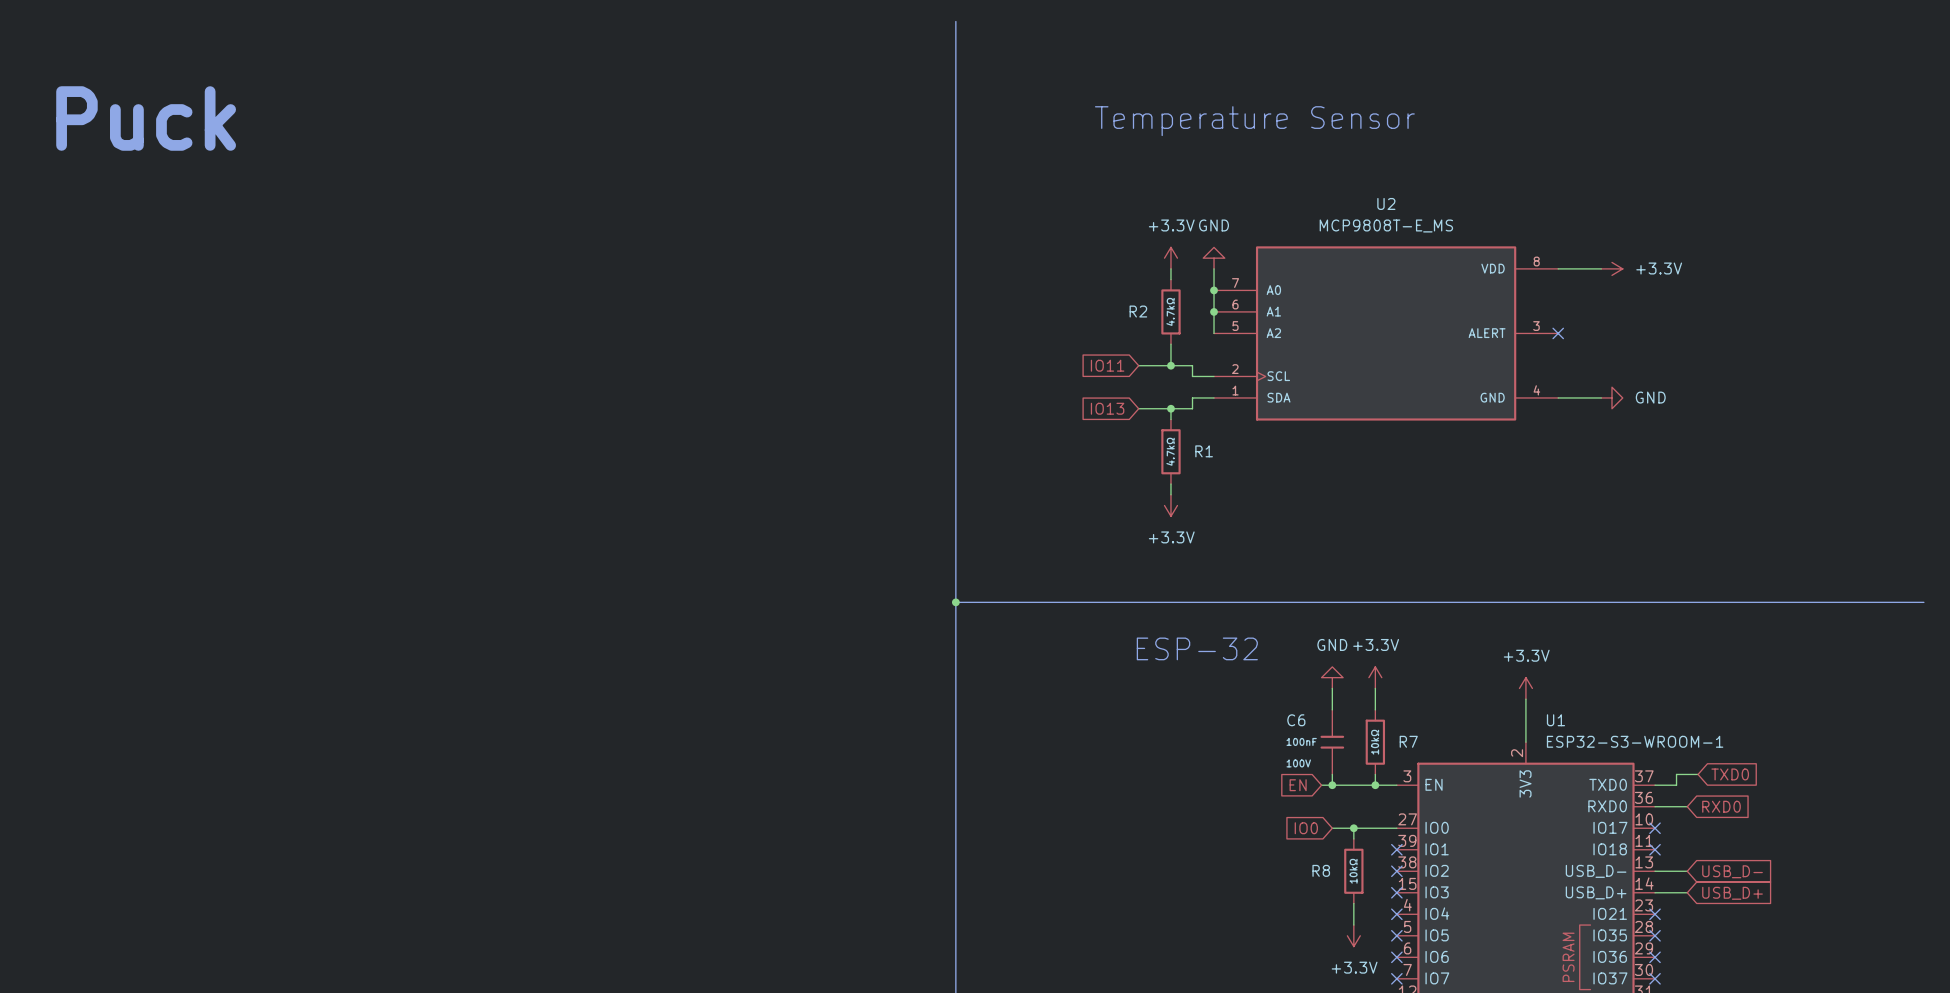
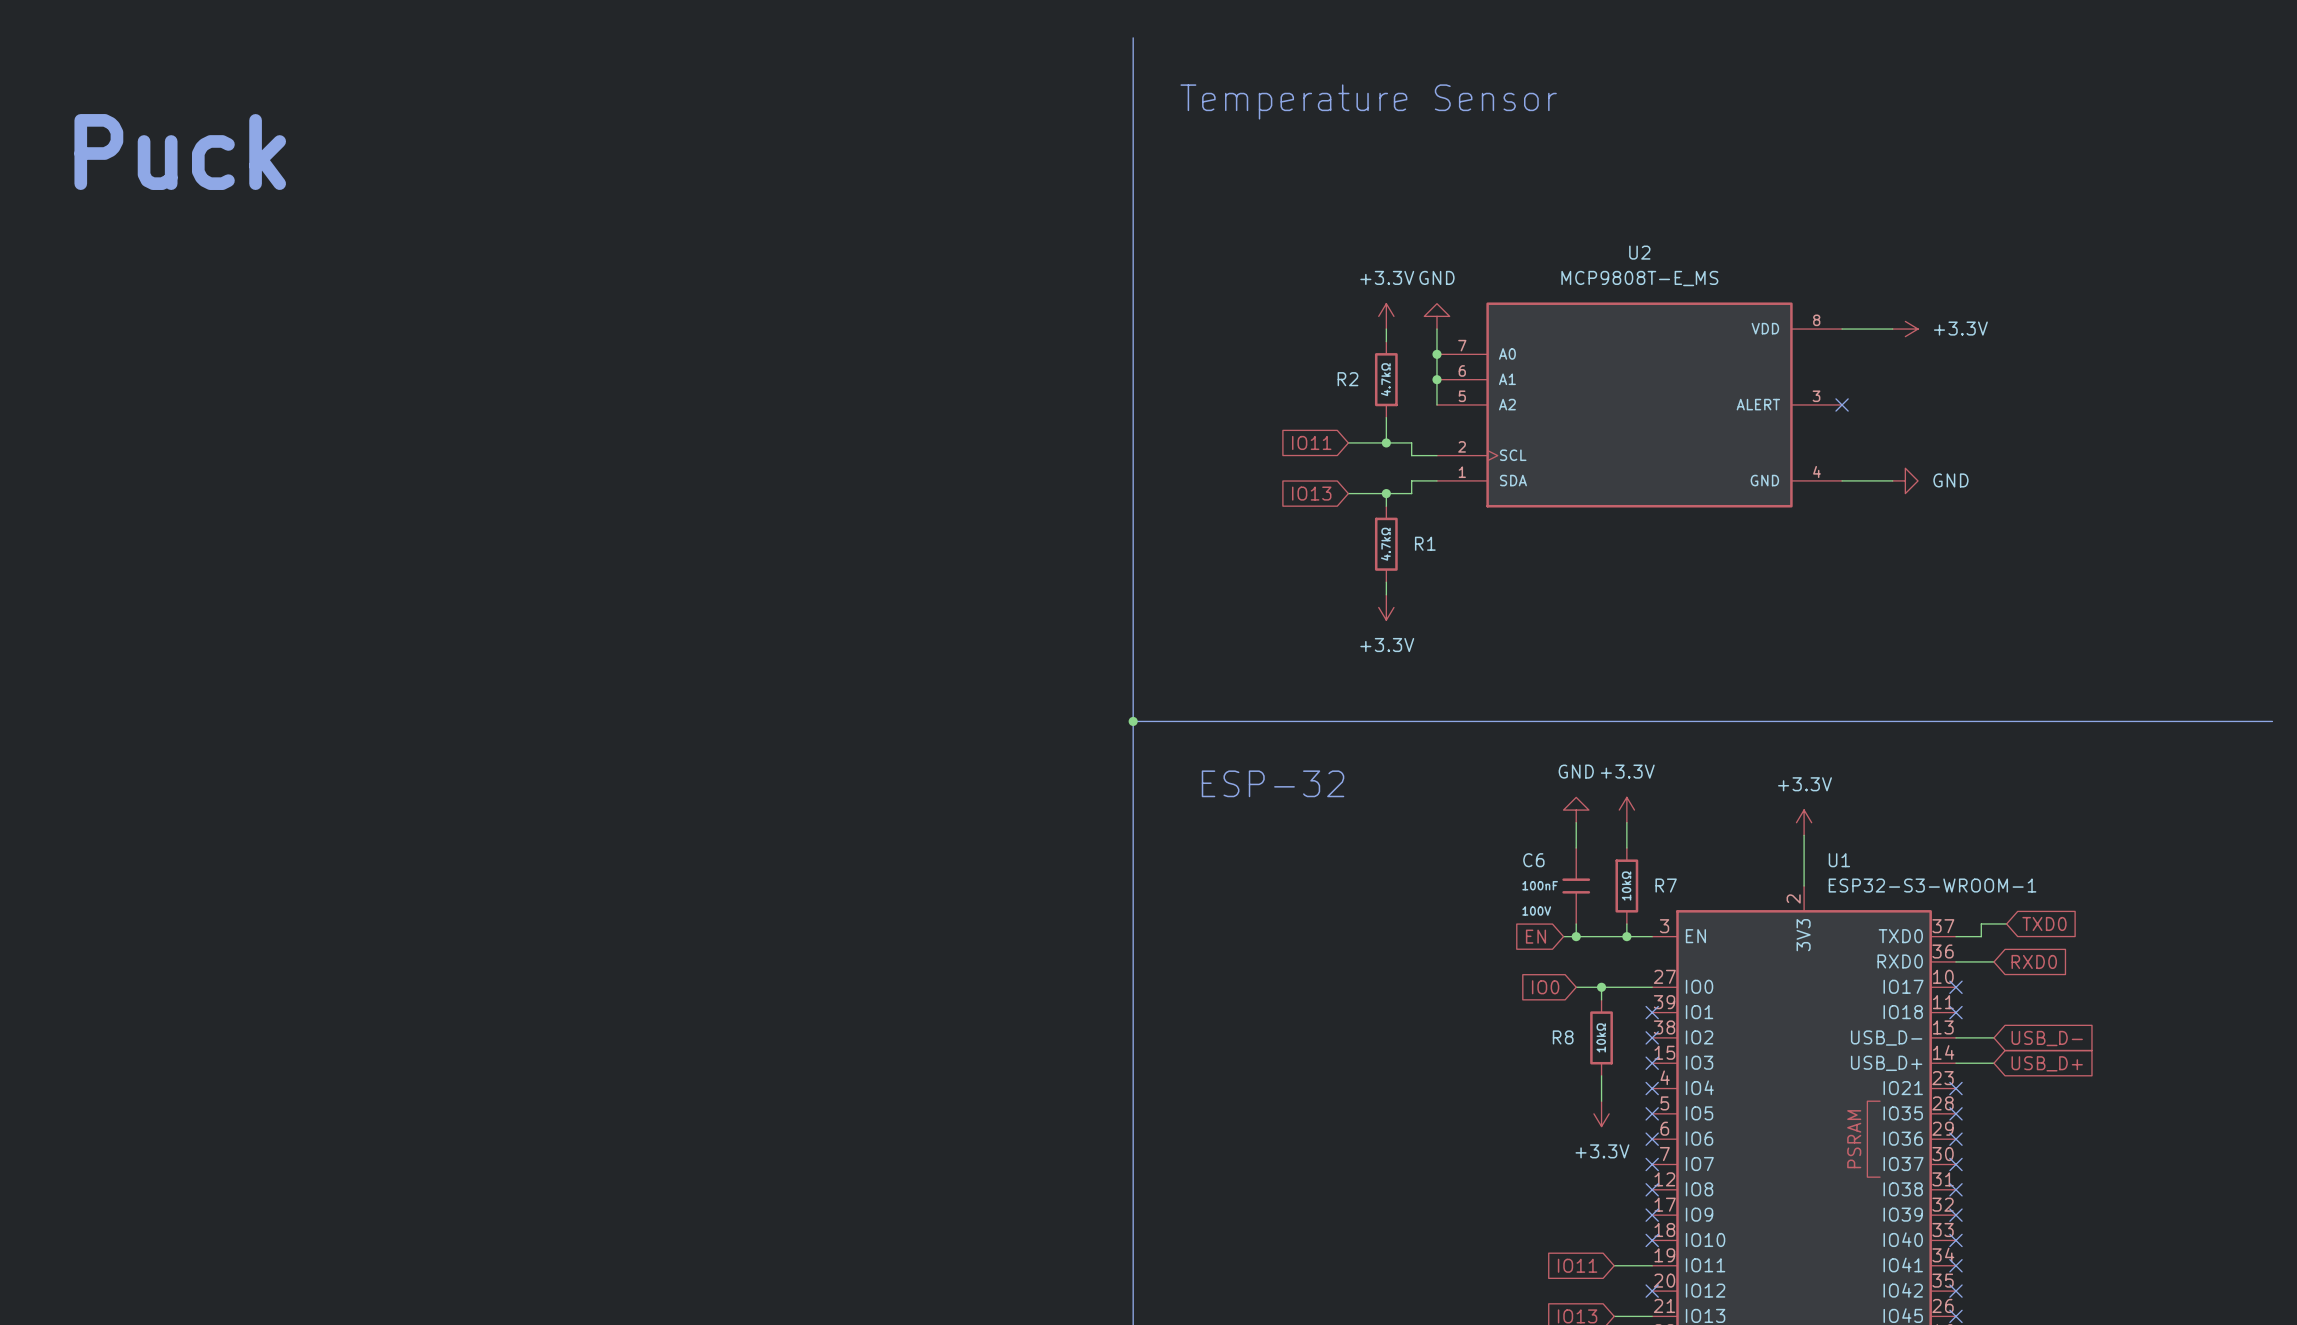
text position: Temperature Sensor (1254, 121) -> Temperature Sensor (1368, 101)
text position: ESP-32 (1197, 648) -> ESP-32 (1273, 783)

